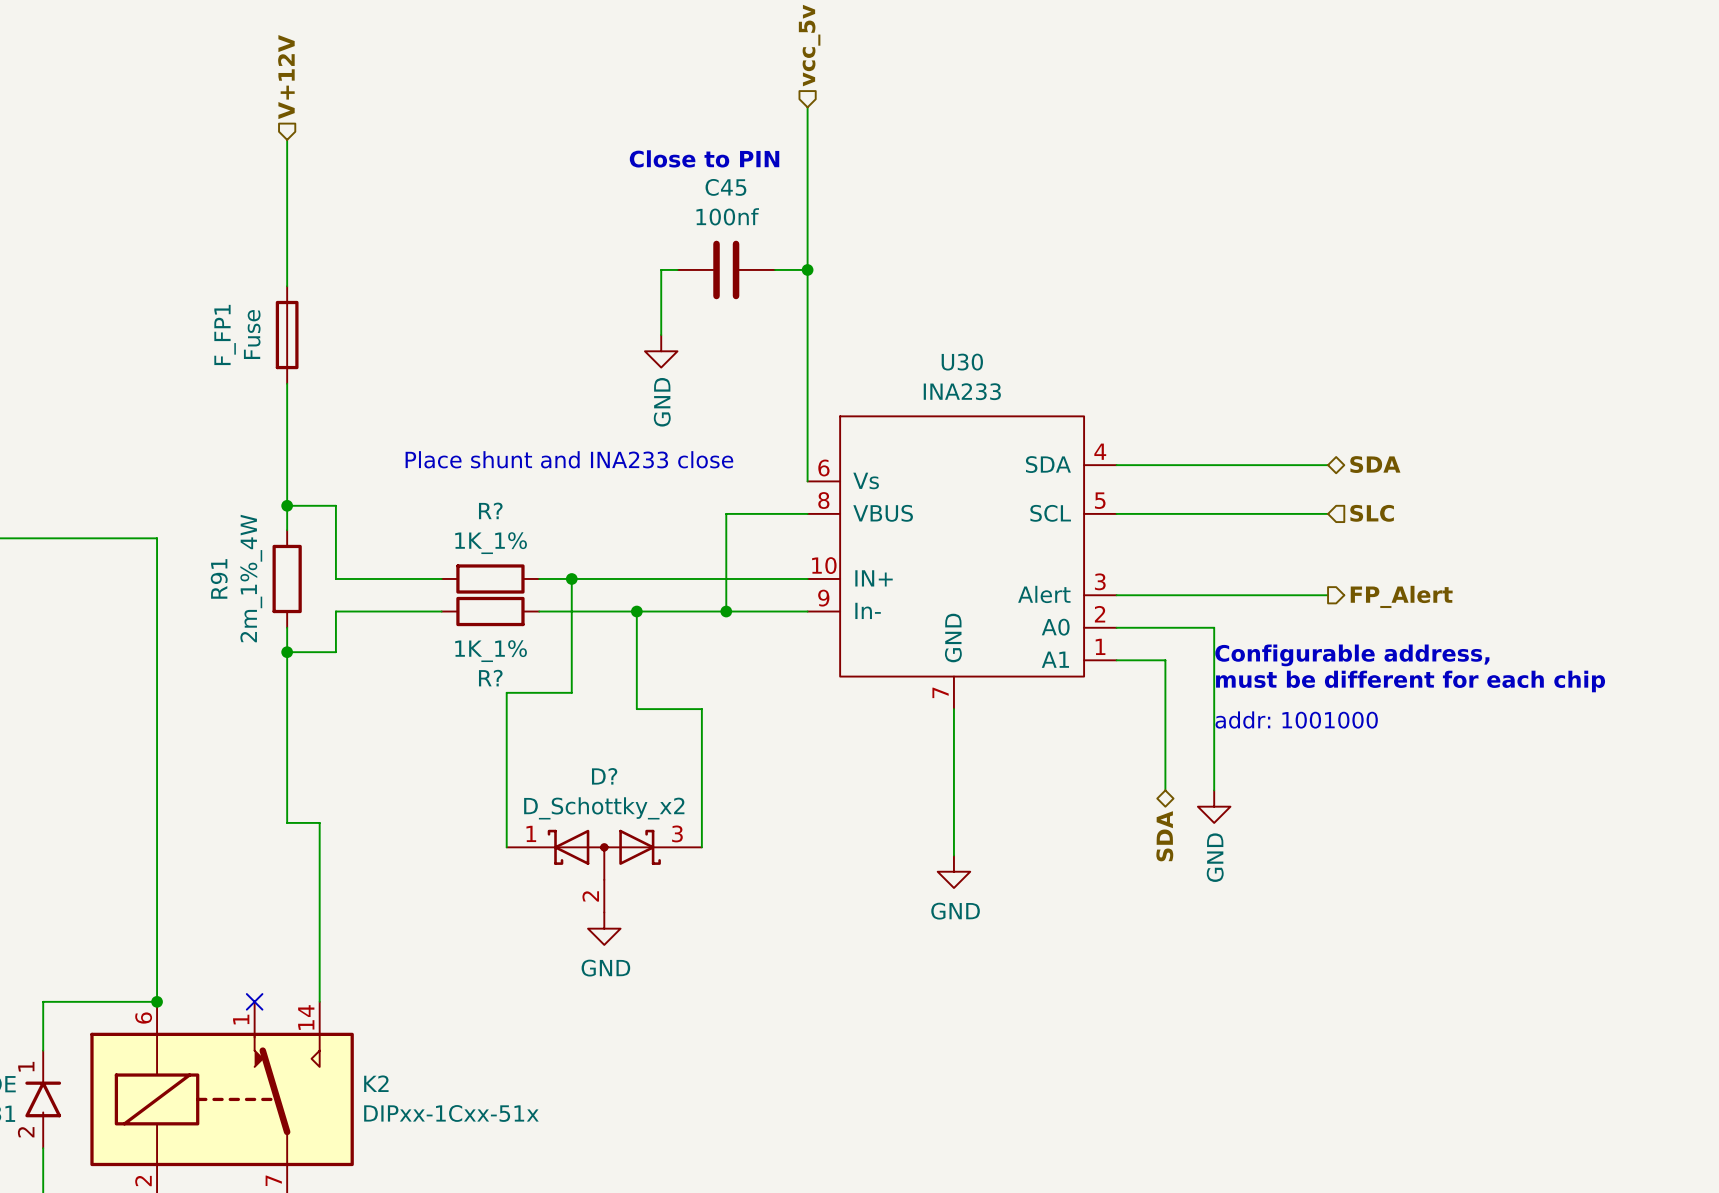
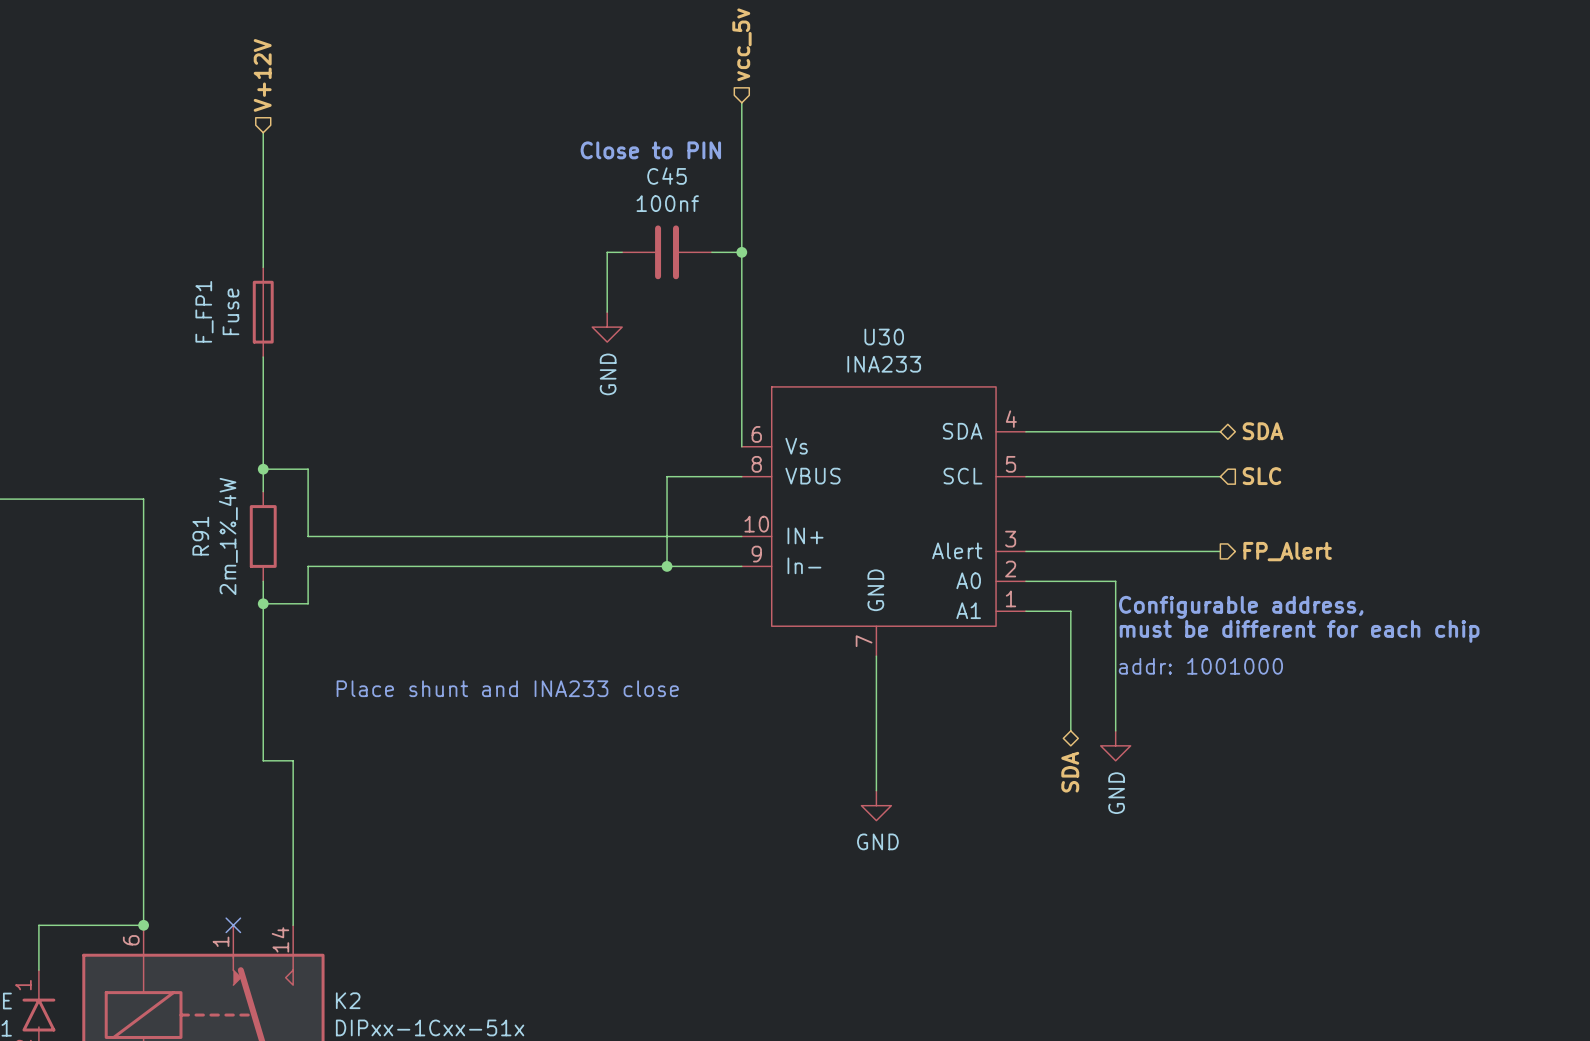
text position: Place shunt and INA233 close (569, 459) -> Place shunt and INA233 close (507, 688)
wire: none -> (405, 536) (495, 536)
R?: 1K_1% (490, 578) -> none
wire: (571, 578) (571, 692) (506, 692) (506, 847) -> none
junction: (571, 578) -> none
wire: none -> (405, 566) (495, 566)
R?: 1K_1% (490, 611) -> none
wire: (636, 611) (636, 709) (701, 709) (701, 847) -> none
junction: (636, 611) -> none
D?: D_Schottky_x2 (604, 871) -> none
power symbol: GND (604, 928) -> none

